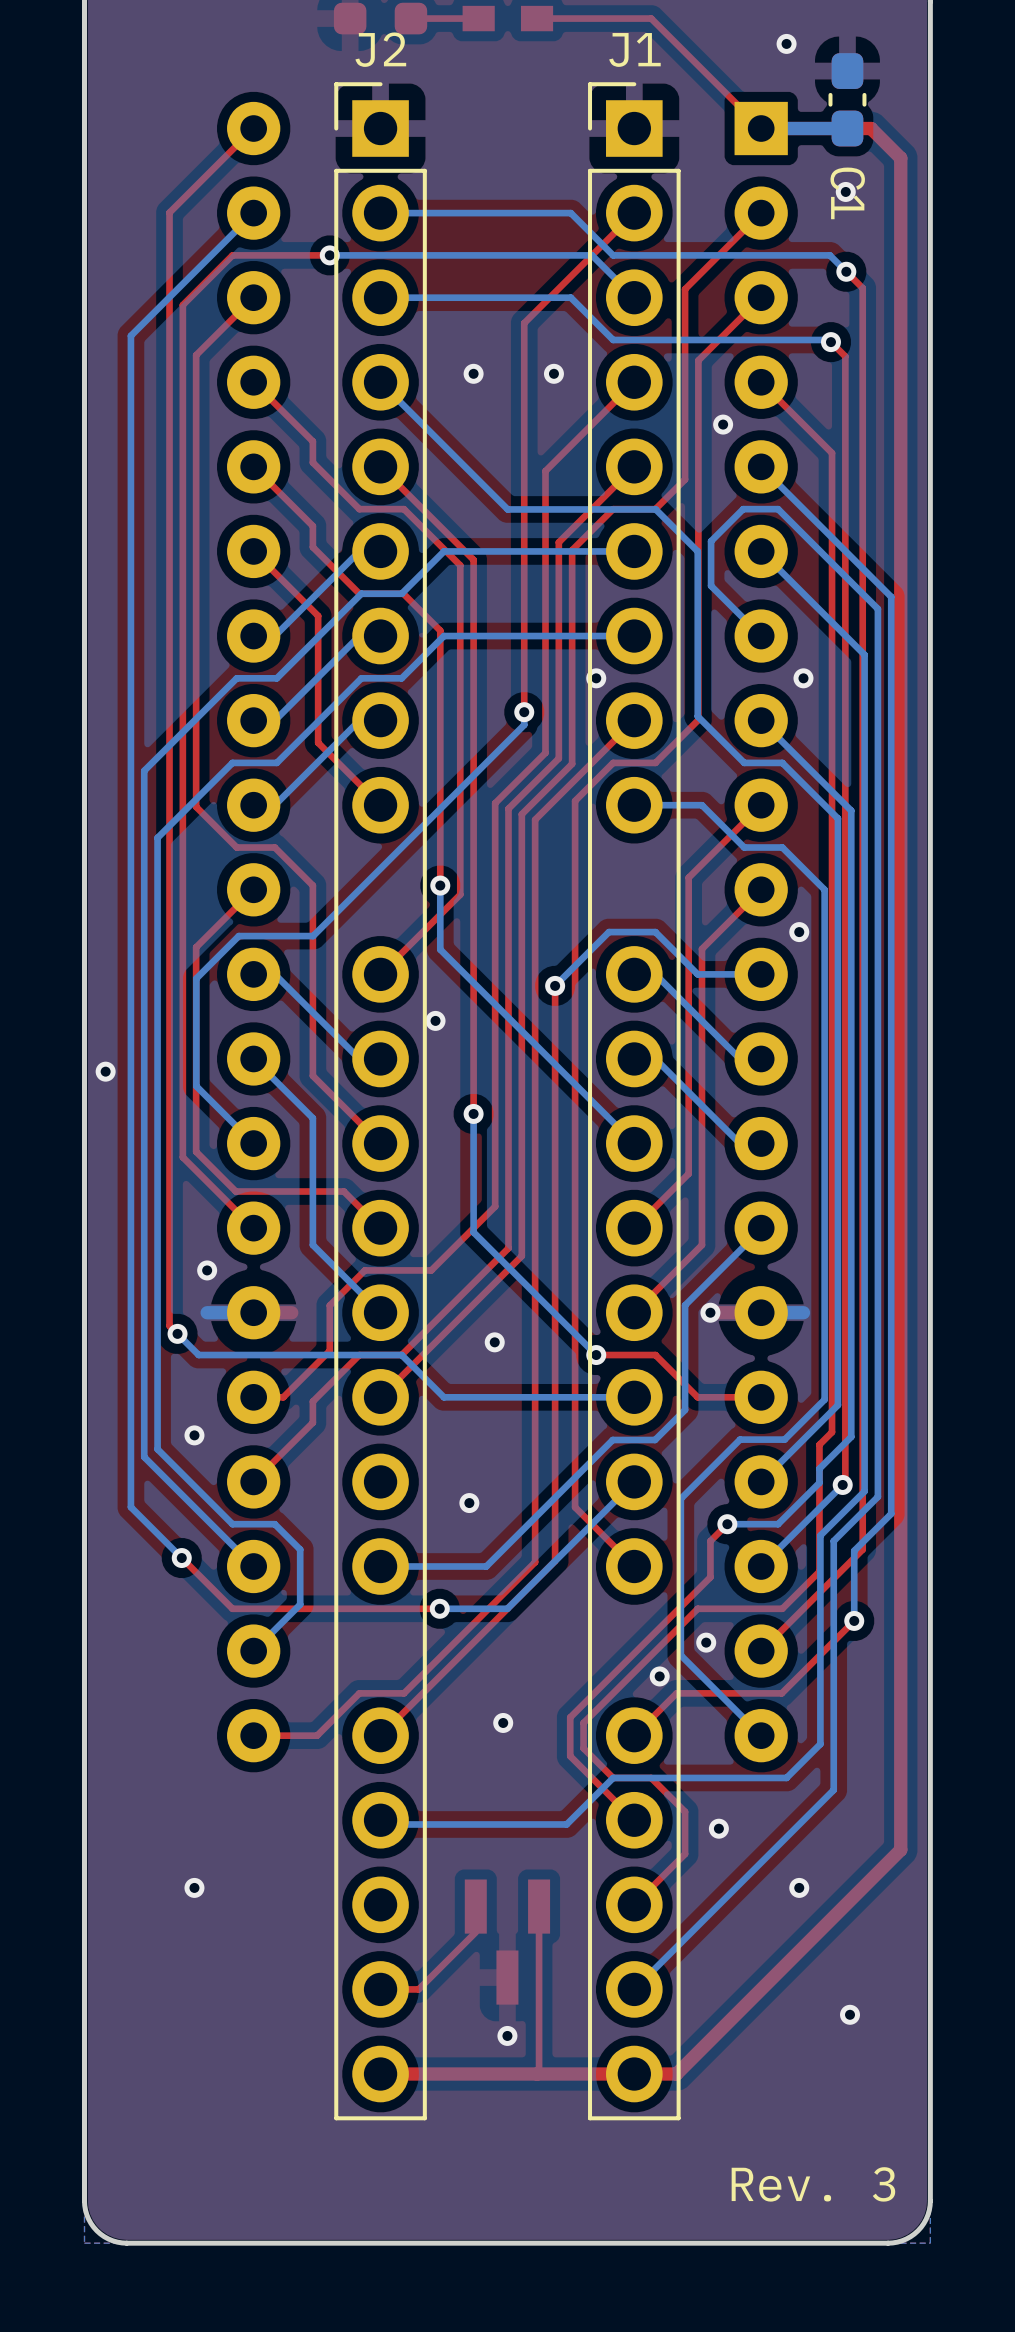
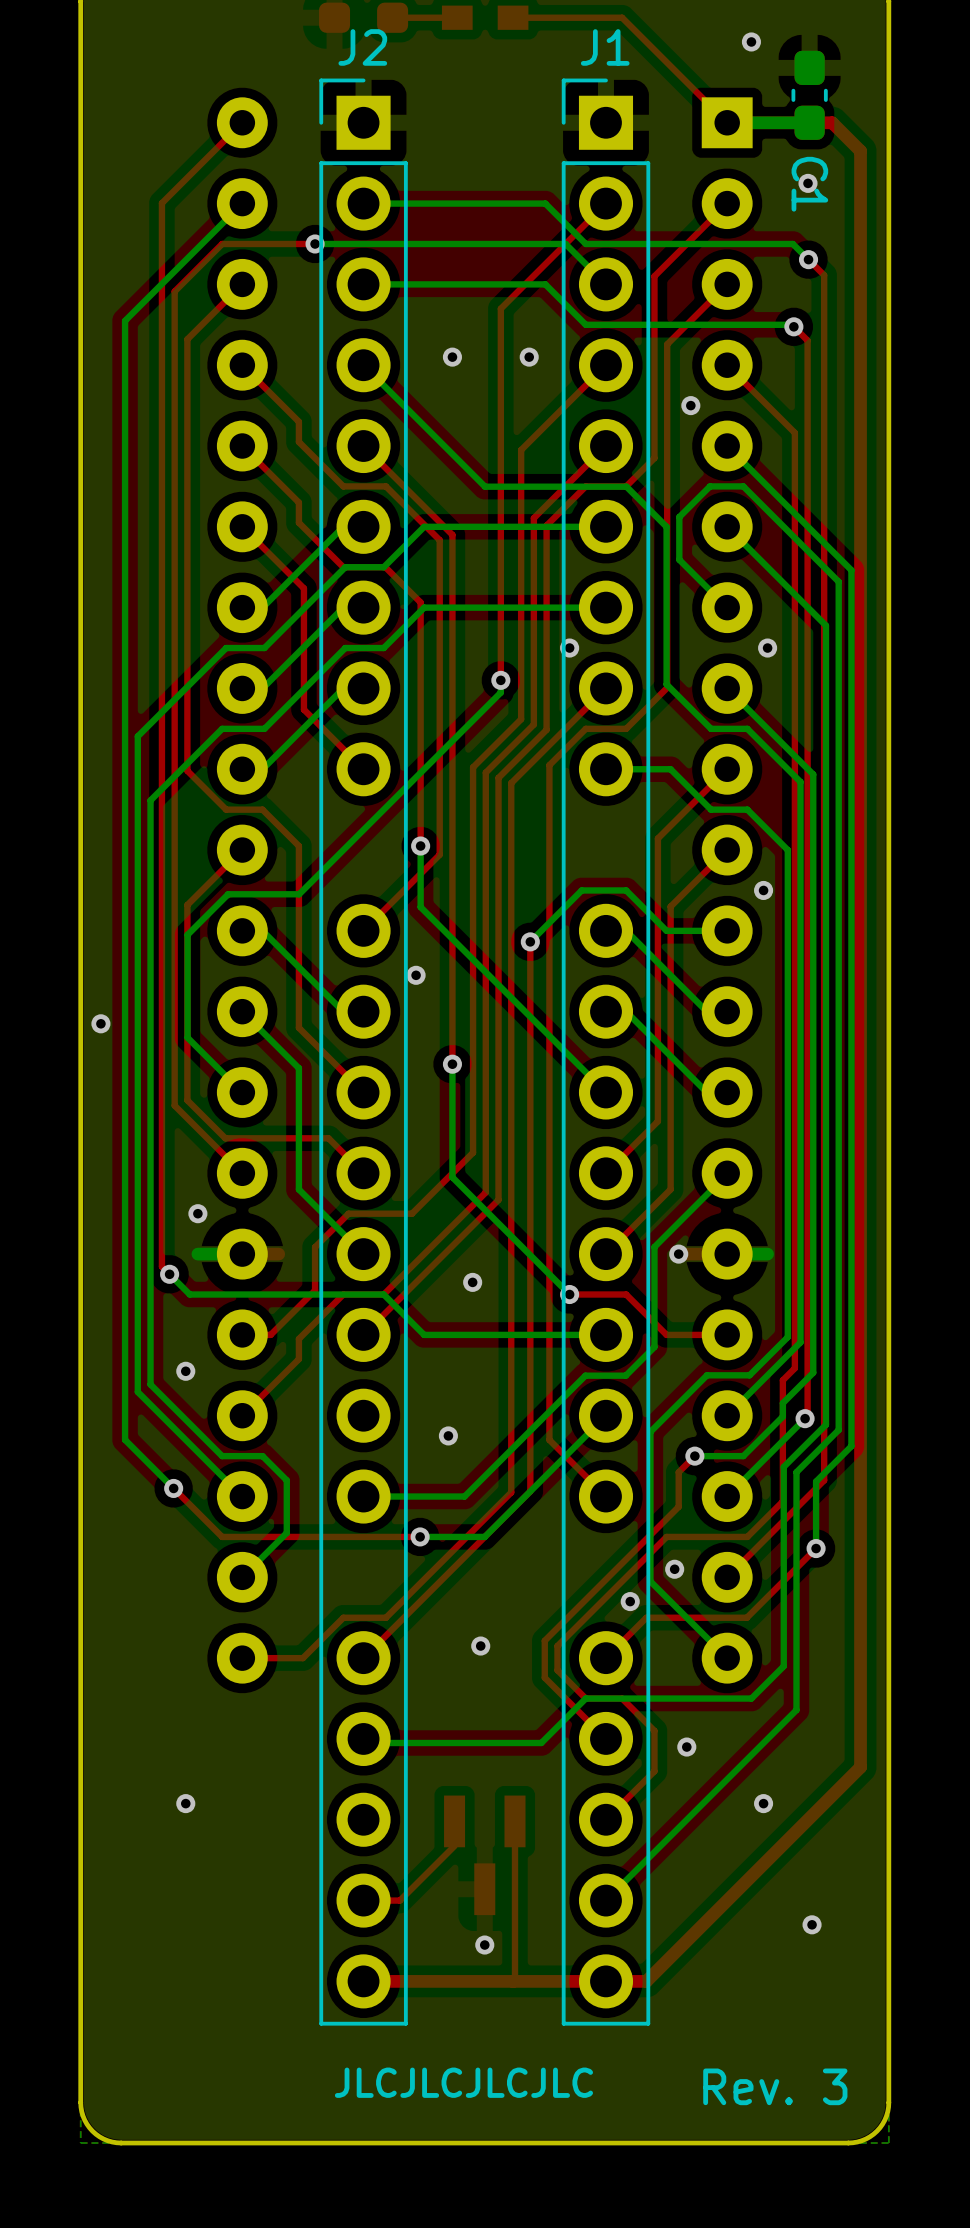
text: none -> JLCJLCJLCJLC (463, 2082)

